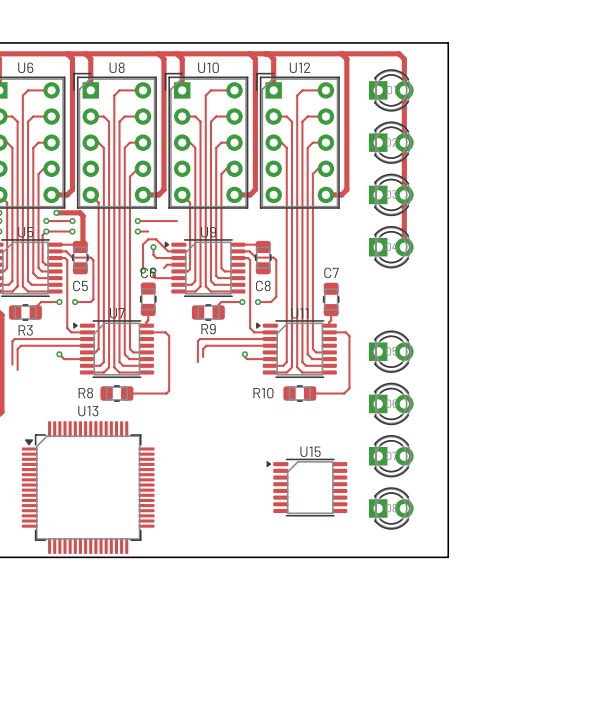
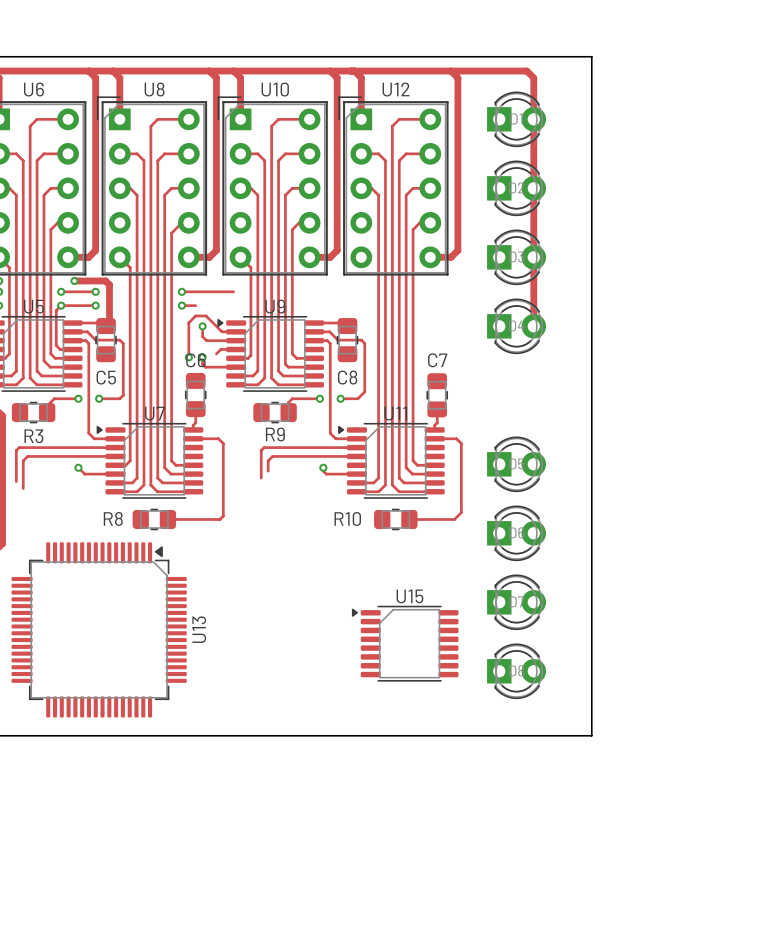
U13 rotation: 0° (88, 487) -> 90° clockwise (99, 629)

